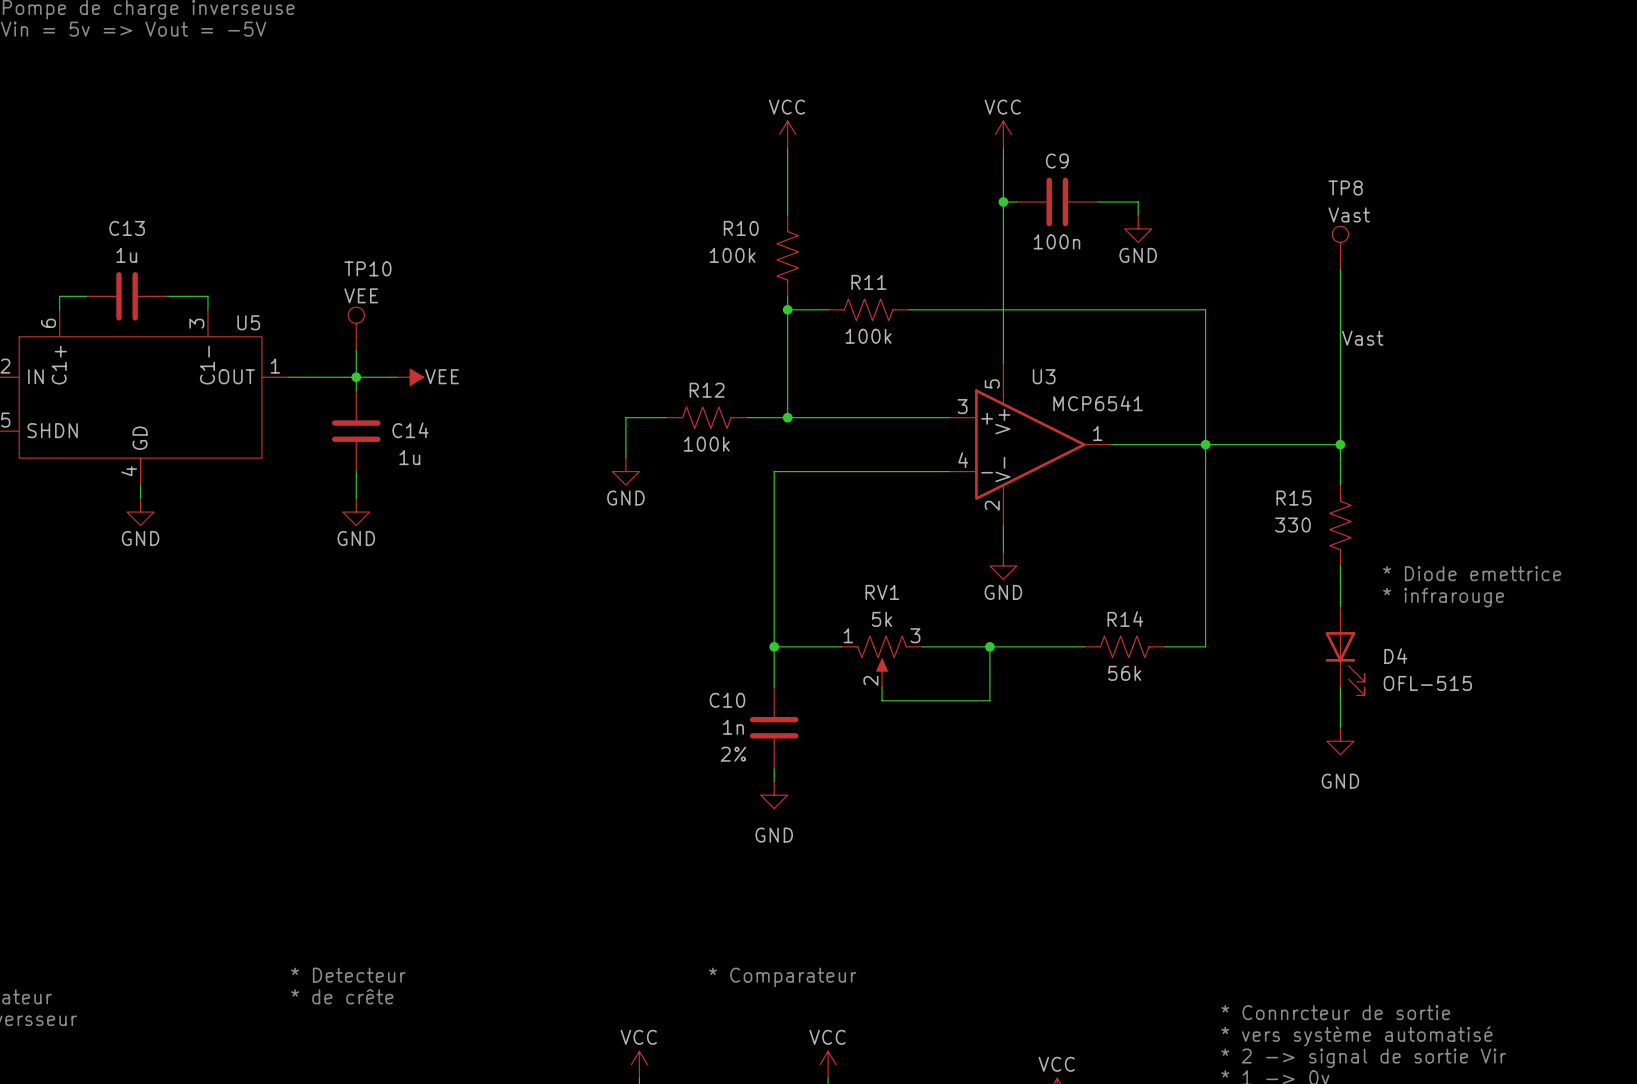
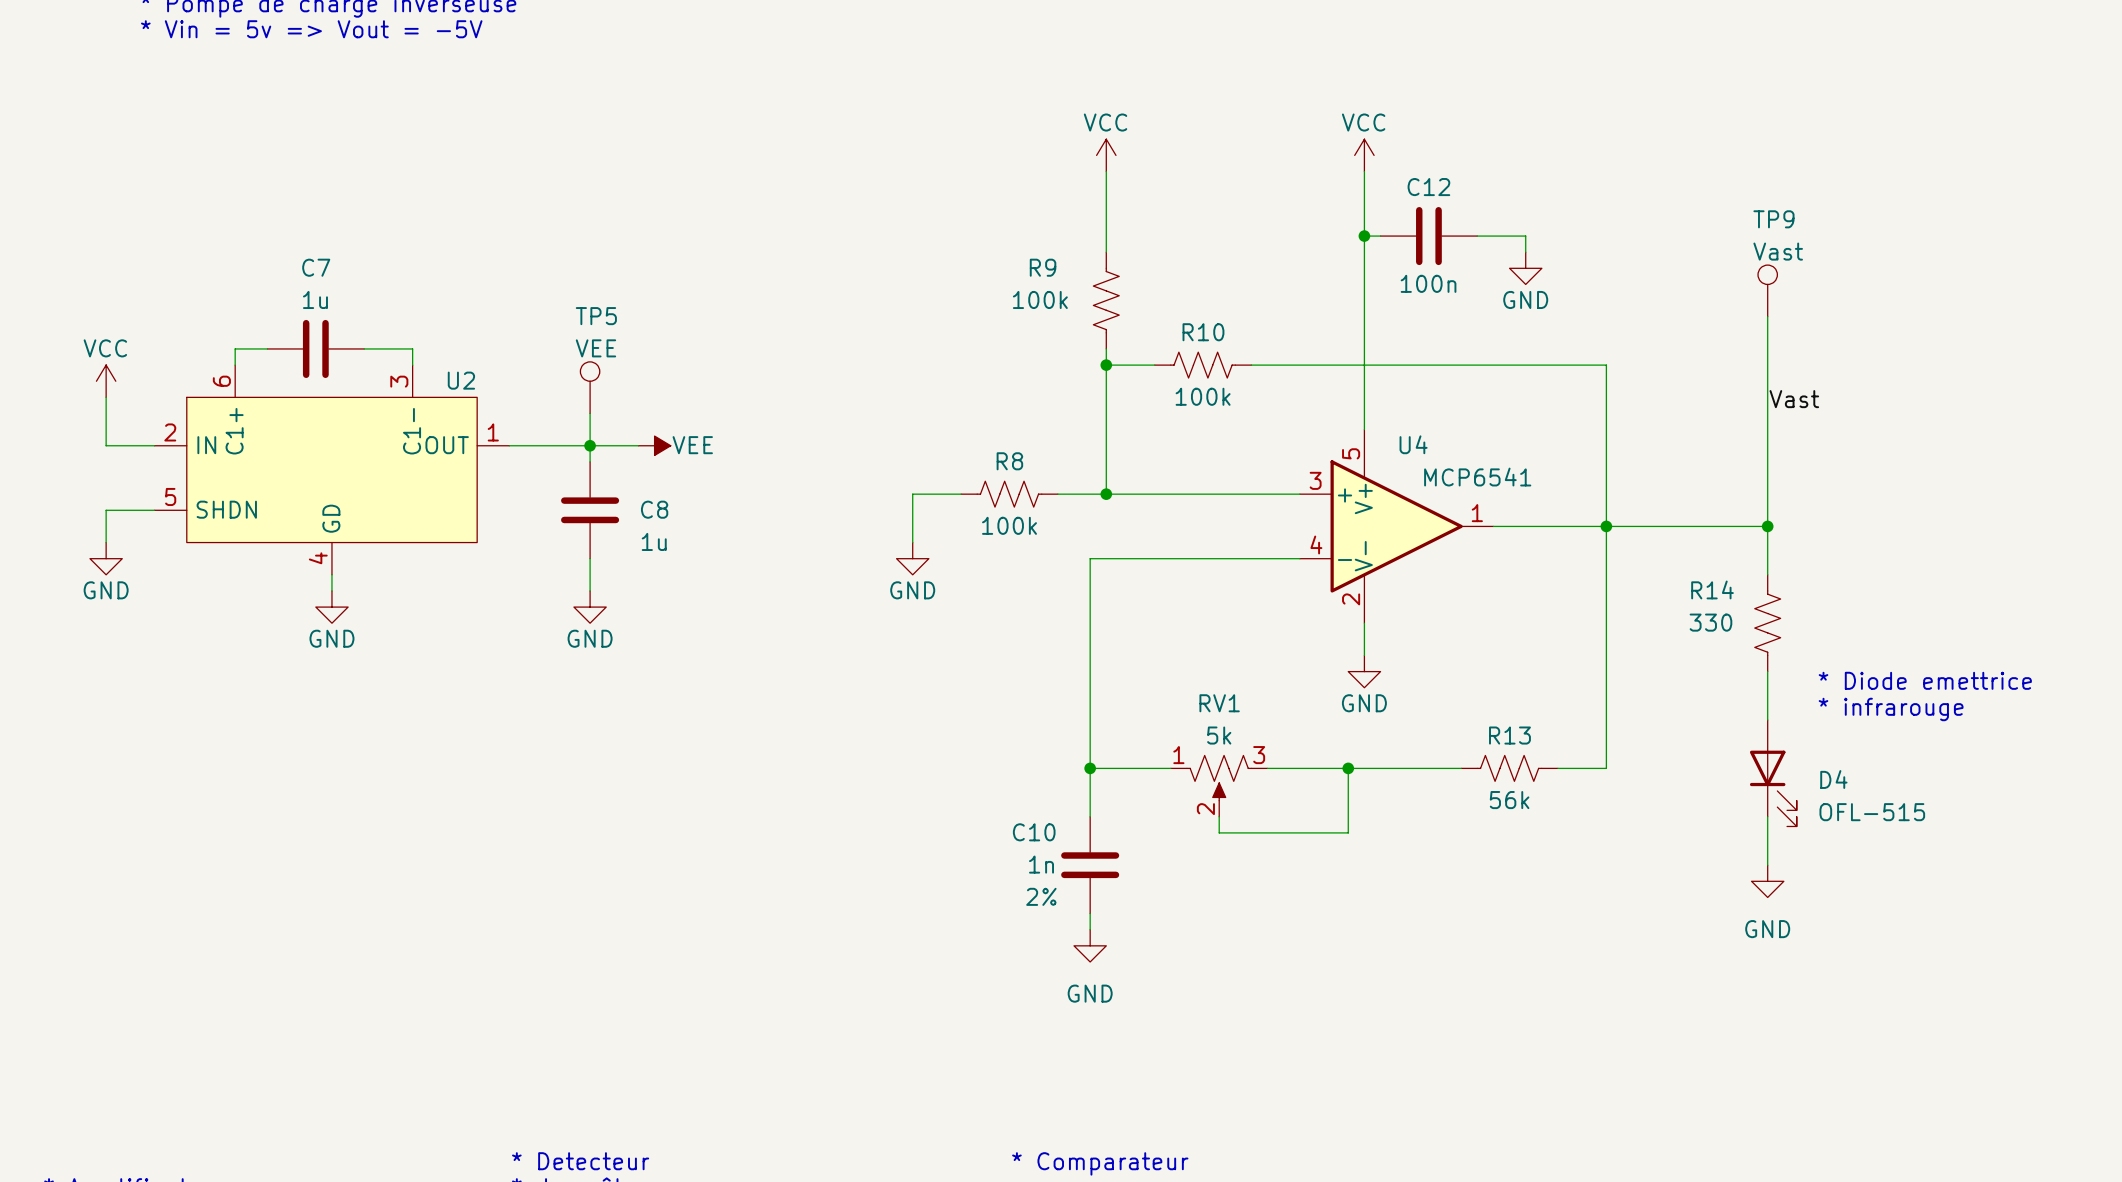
C9 name: C9 (1057, 161) -> C12 (1428, 187)
TP8 name: TP8 (1345, 187) -> TP9 (1773, 219)
C13 name: C13 (127, 228) -> C7 (316, 267)
R10 name: R10 (741, 228) -> R9 (1043, 267)
TP10 name: TP10 (367, 268) -> TP5 (596, 316)
R11 name: R11 (868, 282) -> R10 (1203, 332)
U5 name: U5 (248, 322) -> U2 (461, 380)
U3 name: U3 (1044, 376) -> U4 (1413, 444)
R12 name: R12 (707, 390) -> R8 (1009, 461)
C14 name: C14 (410, 430) -> C8 (654, 509)
R15 name: R15 (1293, 498) -> R14 (1712, 589)
R14 name: R14 (1125, 619) -> R13 (1509, 735)

